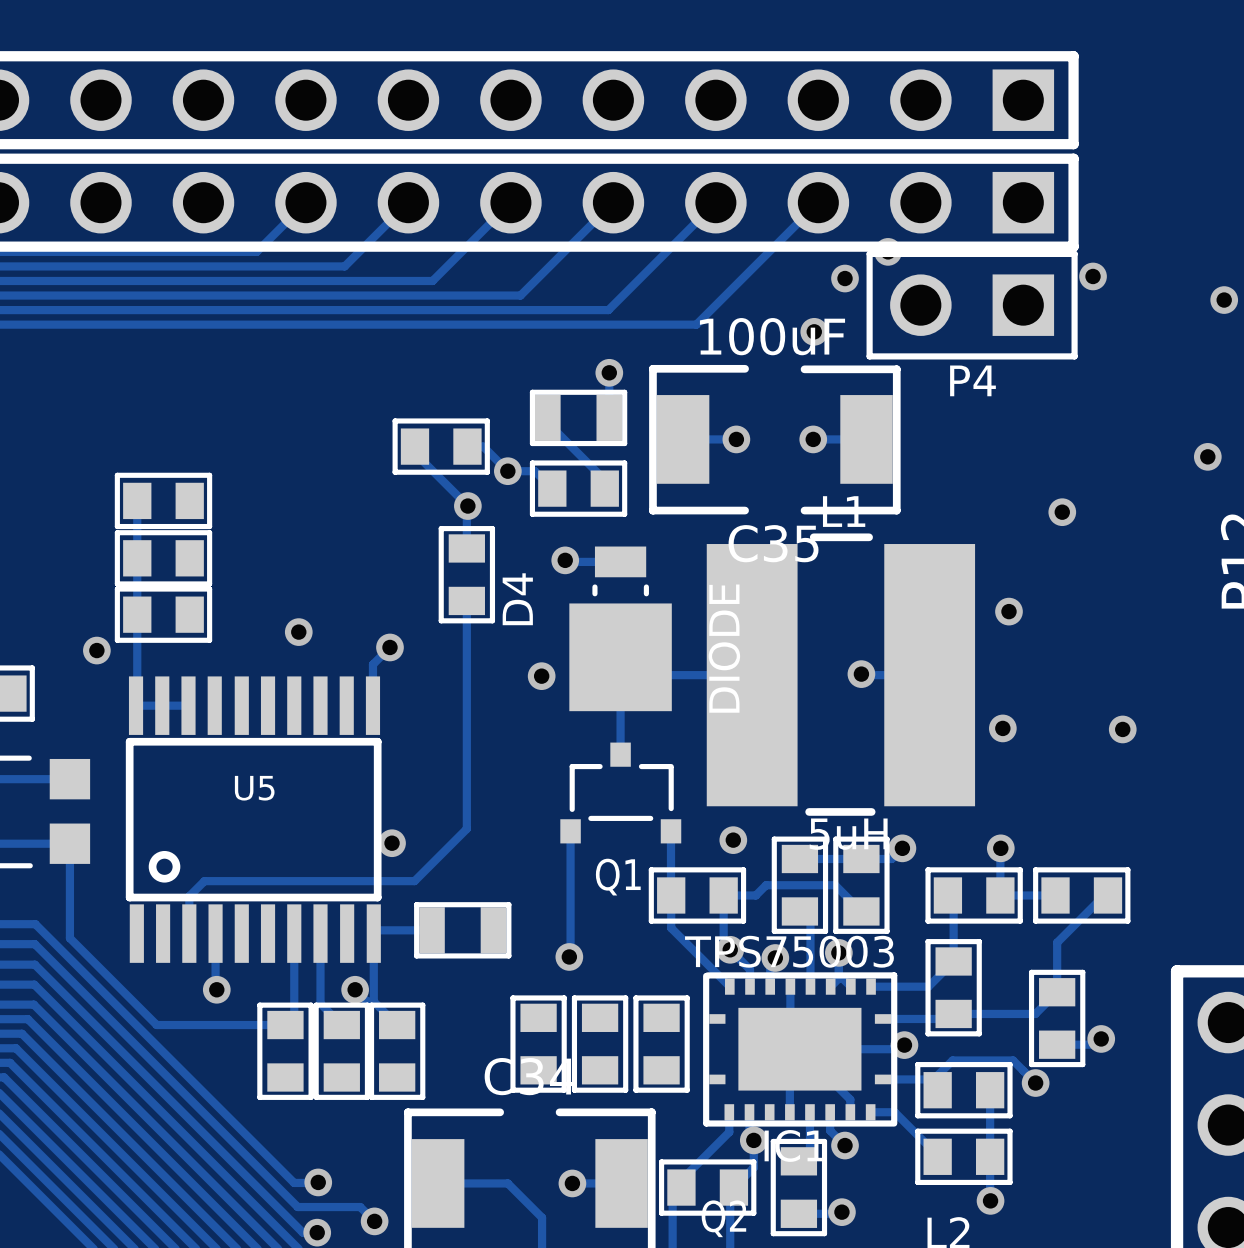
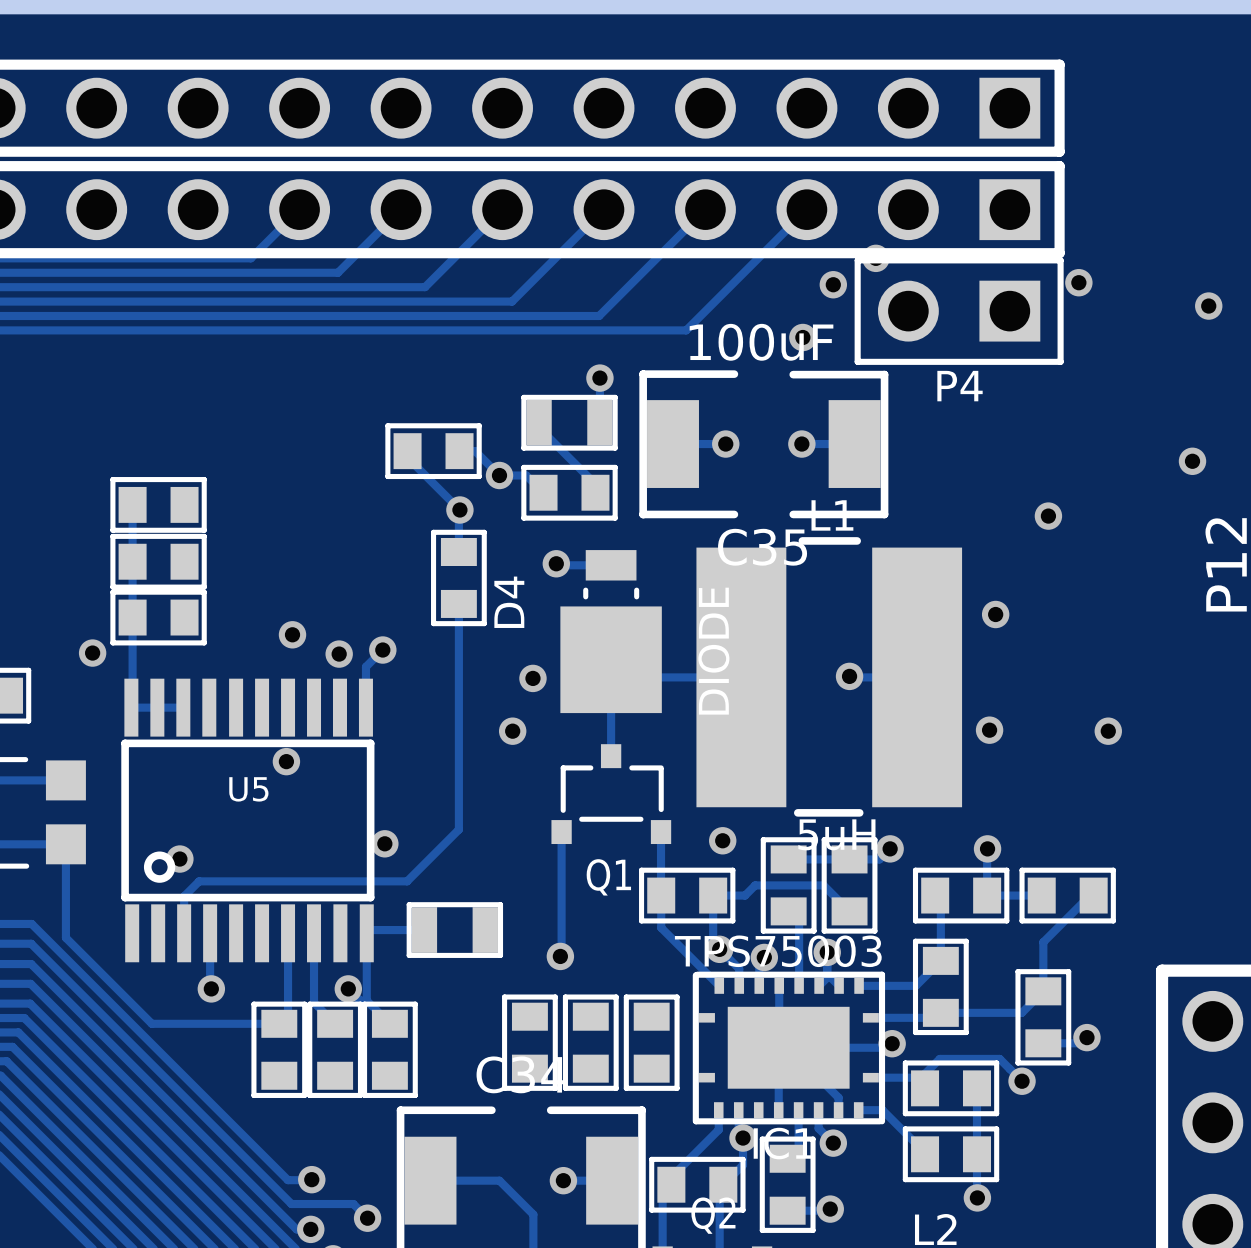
via: none -> (339, 654)
via: none -> (512, 731)
via: none -> (286, 761)
via: none -> (179, 859)

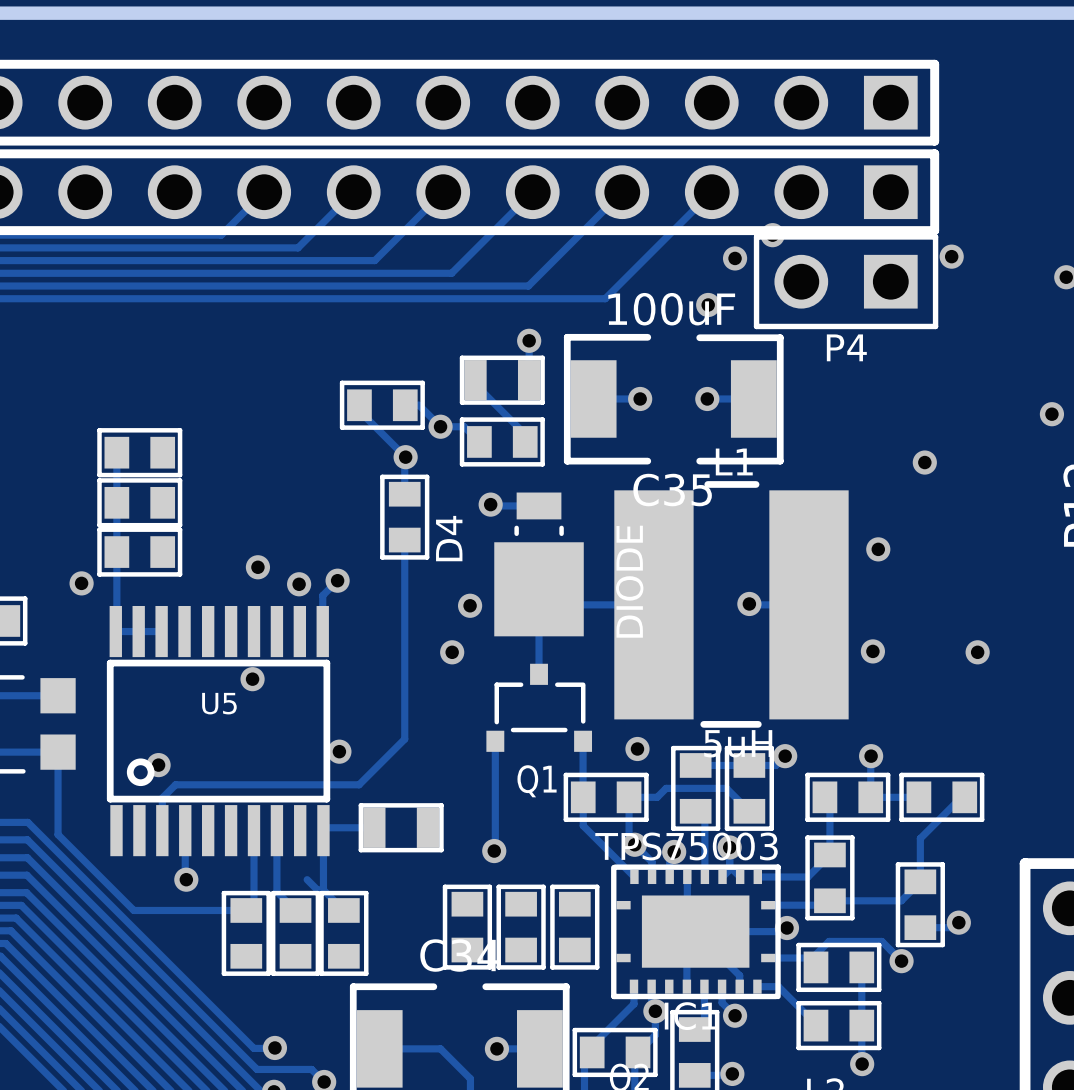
via: (348, 988) -> none

